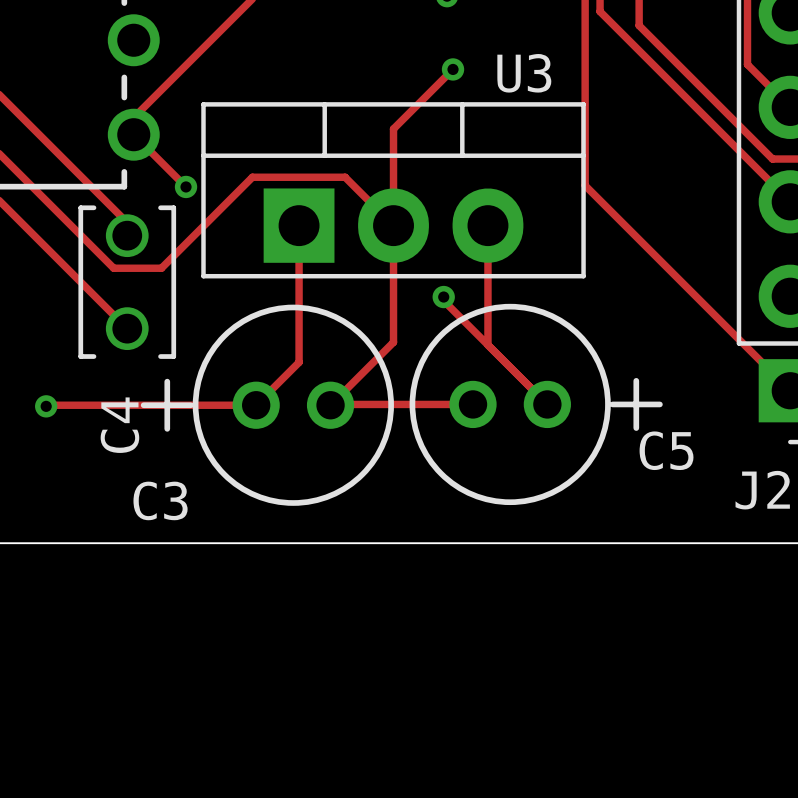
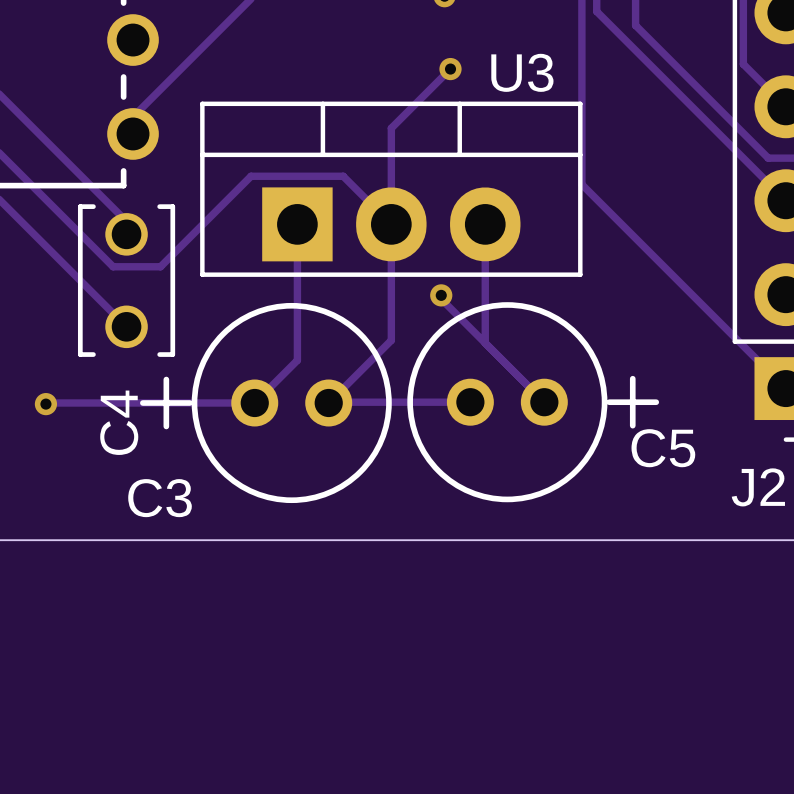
track: (133, 134) (186, 186) -> none
via: (186, 186) -> none

